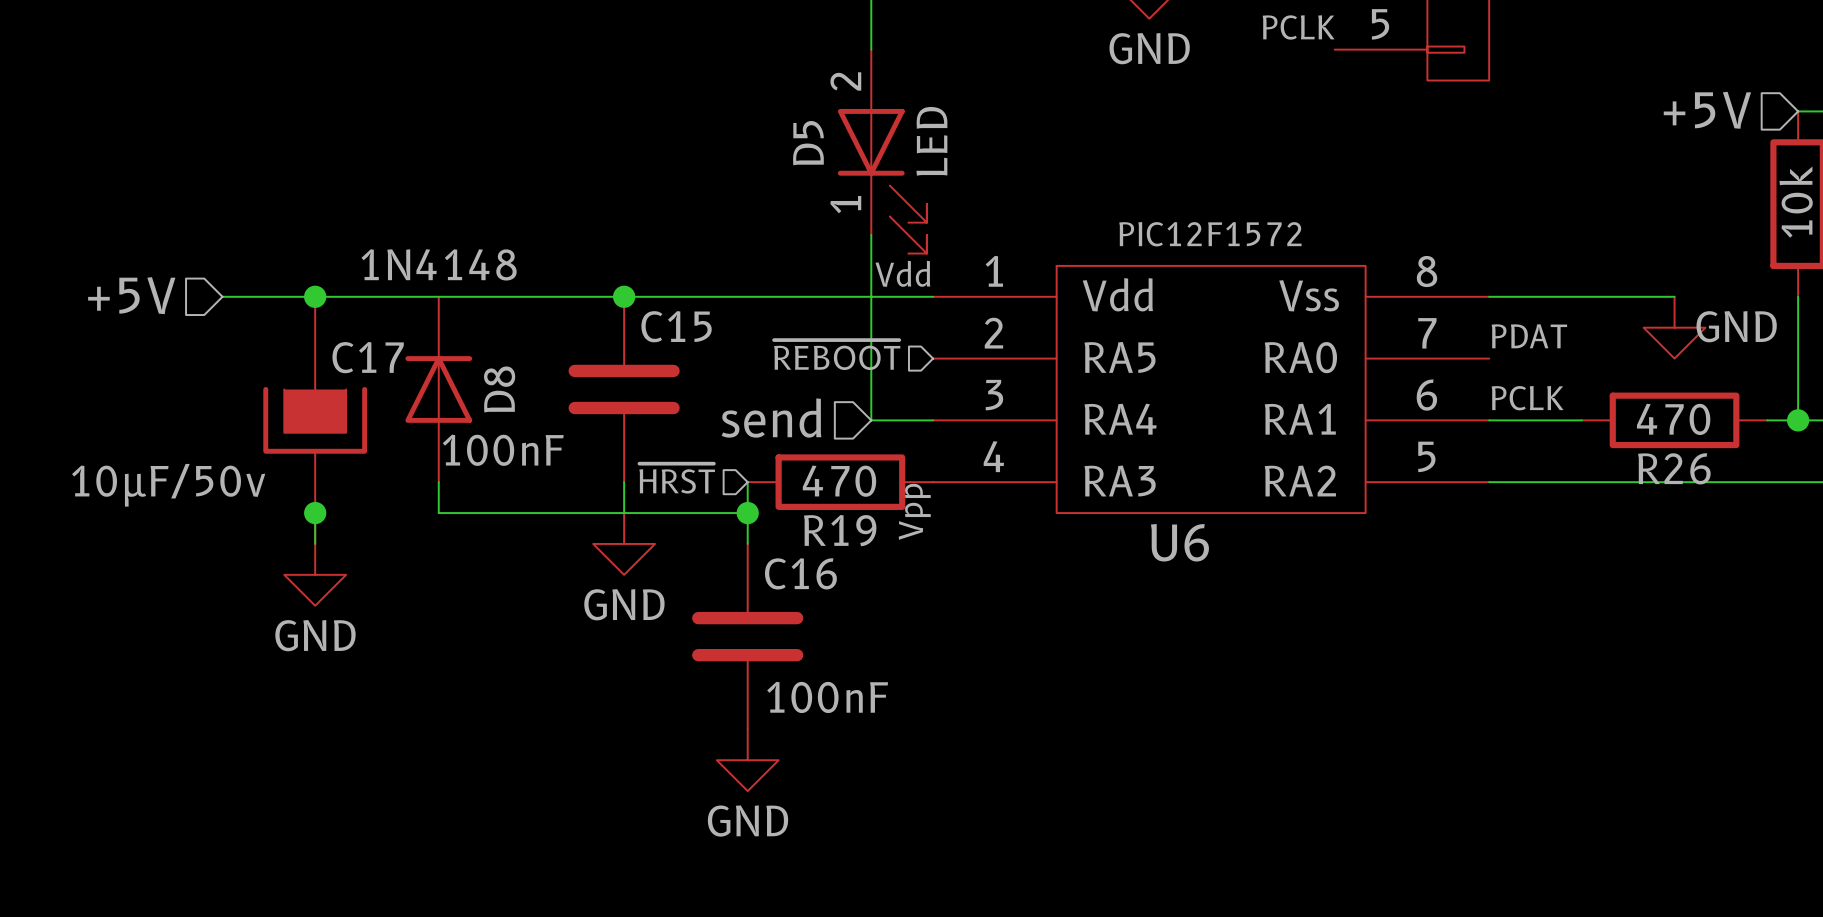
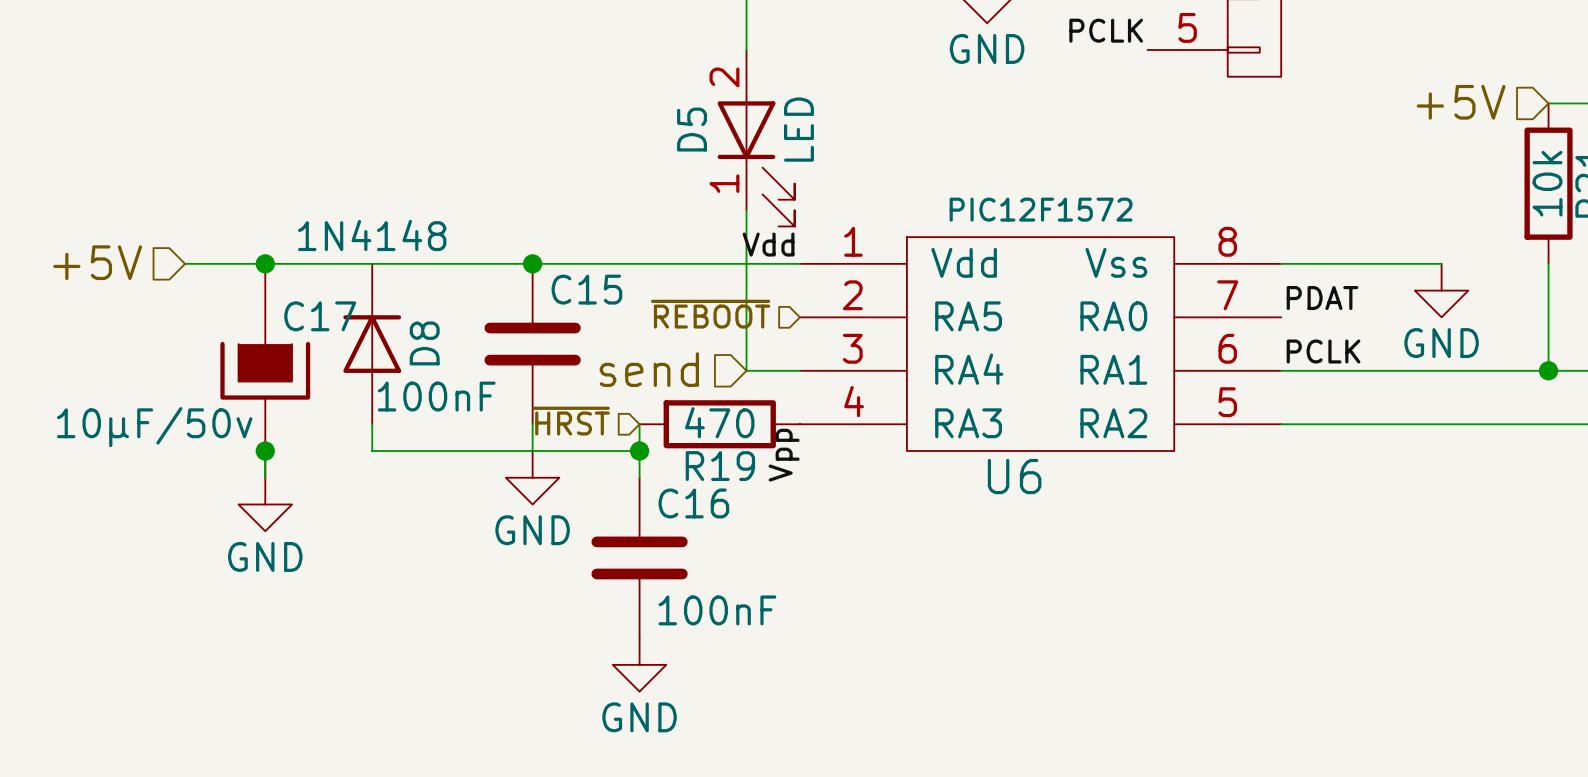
power symbol text position: GND (1736, 326) -> GND (1441, 343)
wire: none -> (1361, 370) (1521, 370)
R26: 470 (1674, 420) -> none

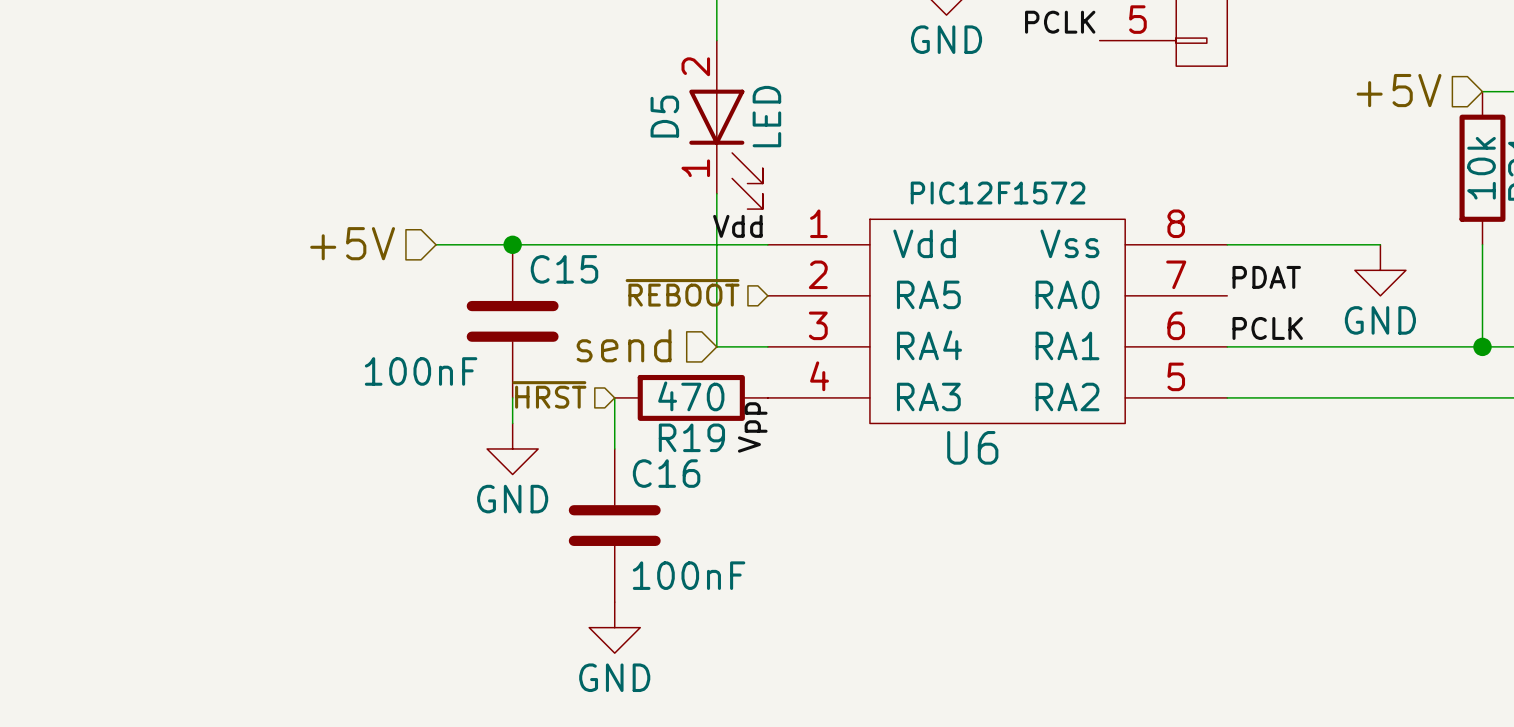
hierarchical label position: +5V (97, 262) -> +5V (352, 243)
wire: (185, 263) (452, 263) -> none
junction: (265, 263) -> none
D8: 1N4148 (372, 344) -> none
C17: 10µF/50v (265, 370) -> none
wire: (372, 424) (372, 451) (639, 451) -> none
wire: (265, 451) (265, 477) -> none
junction: (265, 451) -> none
junction: (639, 451) -> none
power symbol: GND (265, 504) -> none

